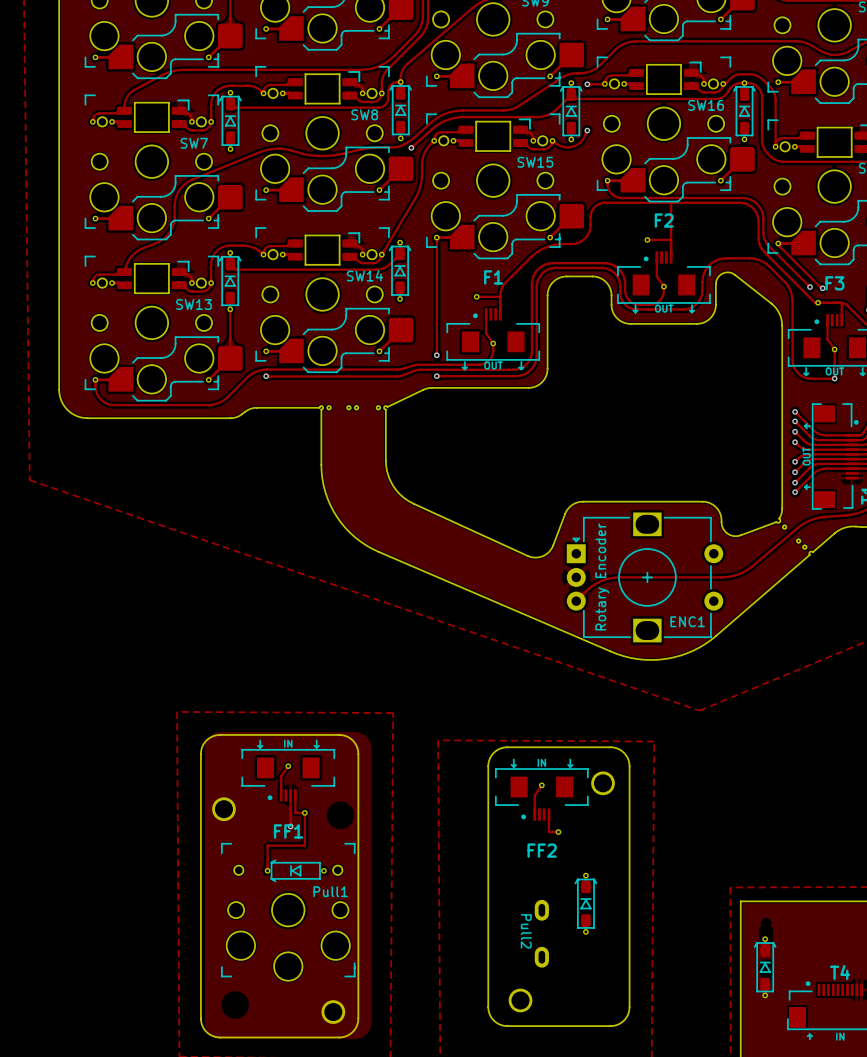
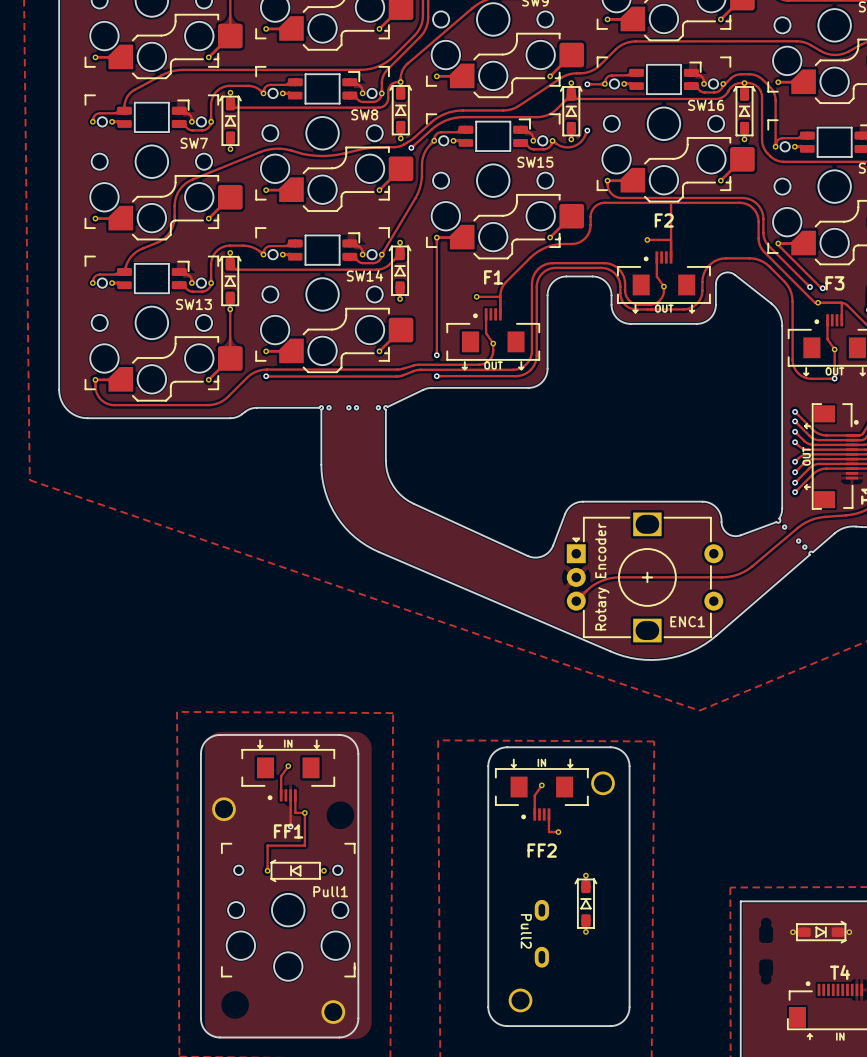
part rotation: 0° (765, 967) -> 90° clockwise (821, 932)
part position: (765, 967) -> (821, 932)

